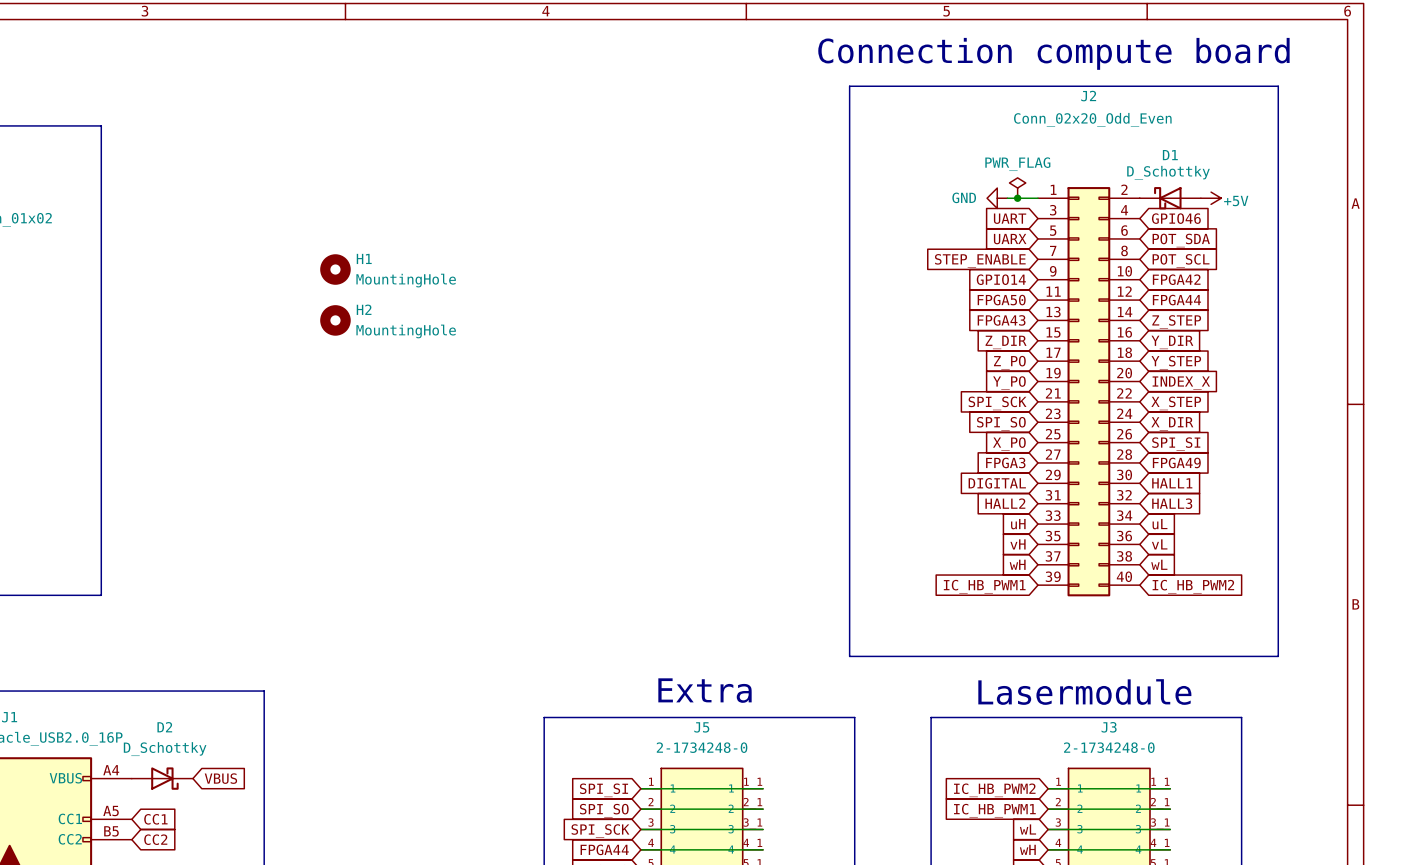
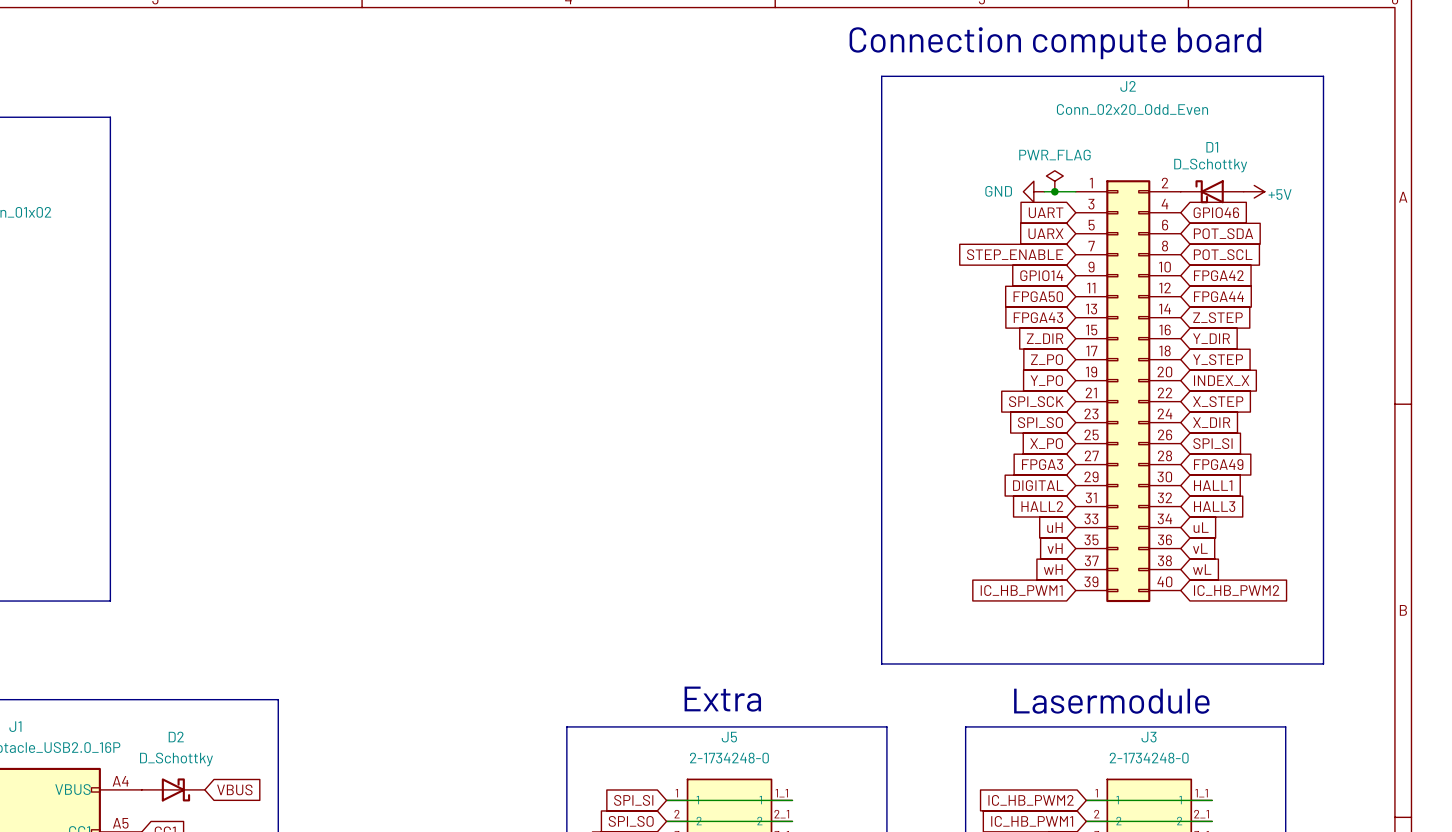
H1: MountingHole (335, 269) -> none
H2: MountingHole (335, 320) -> none

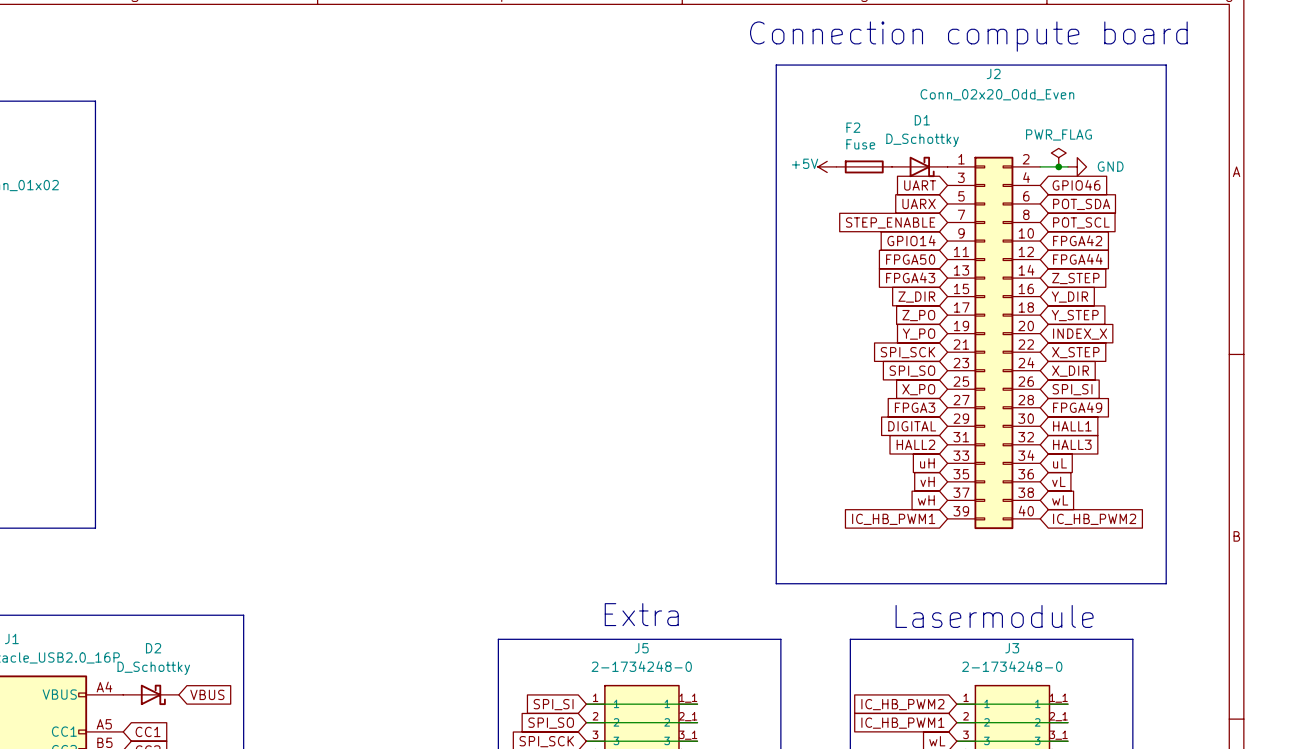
power symbol position: PWR_FLAG (1054, 181) -> PWR_FLAG (1058, 157)
power symbol: none -> +5V (827, 166)
F2: none -> Fuse (864, 166)
power symbol rotation: 0° (1033, 191) -> 180° (1077, 166)
power symbol position: GND (1033, 191) -> GND (1077, 166)
junction: (1054, 191) -> none
junction: none -> (1058, 166)
D1 rotation: 0° (1209, 191) -> 180° (922, 166)
D1 position: (1212, 191) -> (919, 166)
power symbol: +5V (1254, 191) -> none

